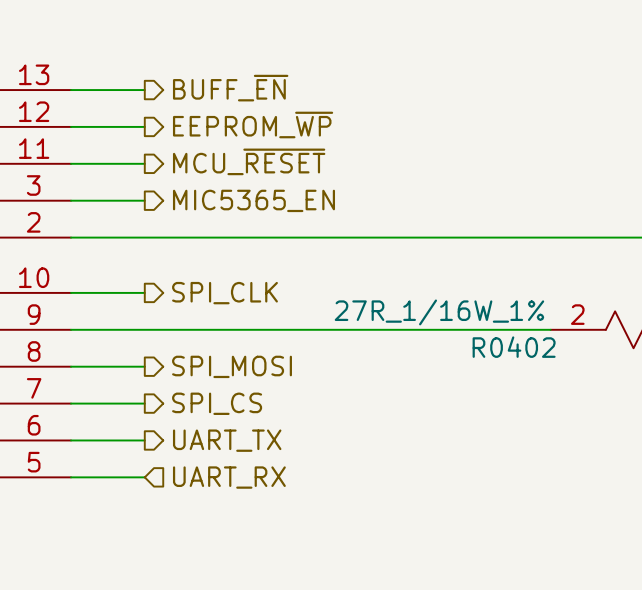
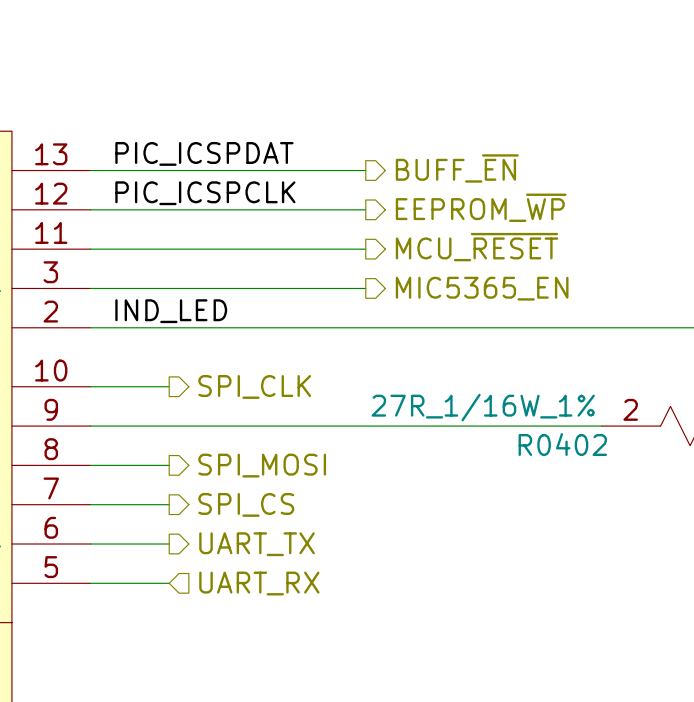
label: none -> PIC_ICSPDAT (204, 153)
hierarchical label position: BUFF_~{EN} (230, 88) -> BUFF_~{EN} (457, 168)
wire: none -> (169, 170) (365, 170)
label: none -> PIC_ICSPCLK (205, 193)
hierarchical label position: EEPROM_~{WP} (253, 125) -> EEPROM_~{WP} (481, 207)
wire: none -> (169, 209) (365, 209)
hierarchical label position: MCU_~{RESET} (249, 161) -> MCU_~{RESET} (476, 247)
wire: none -> (169, 249) (365, 249)
wire: none -> (169, 288) (365, 288)
hierarchical label position: MIC5365_EN (253, 200) -> MIC5365_EN (482, 288)
label: none -> IND_LED (171, 311)

